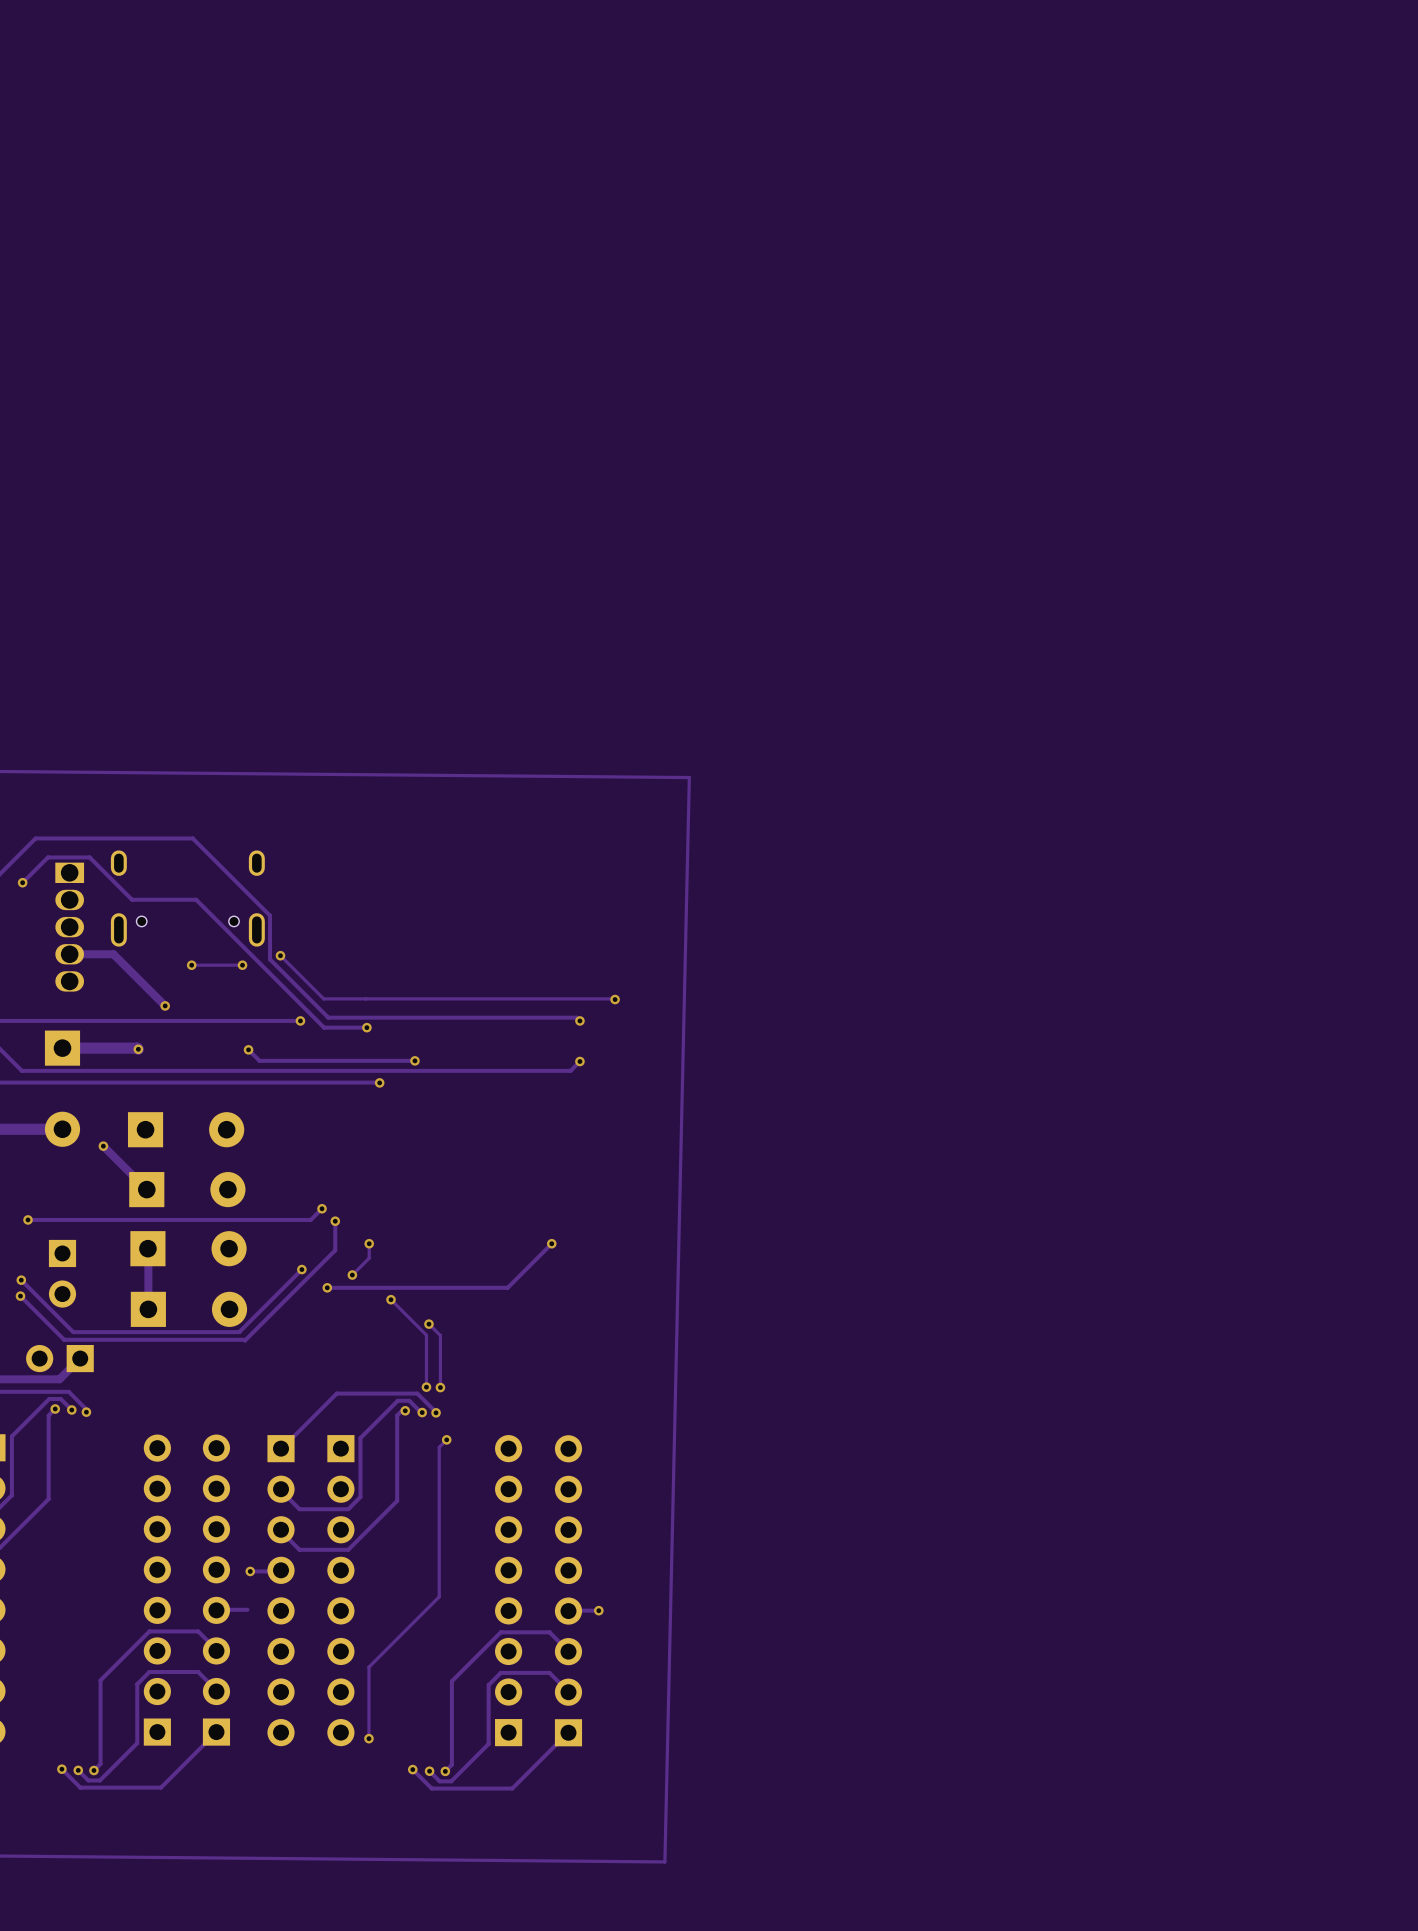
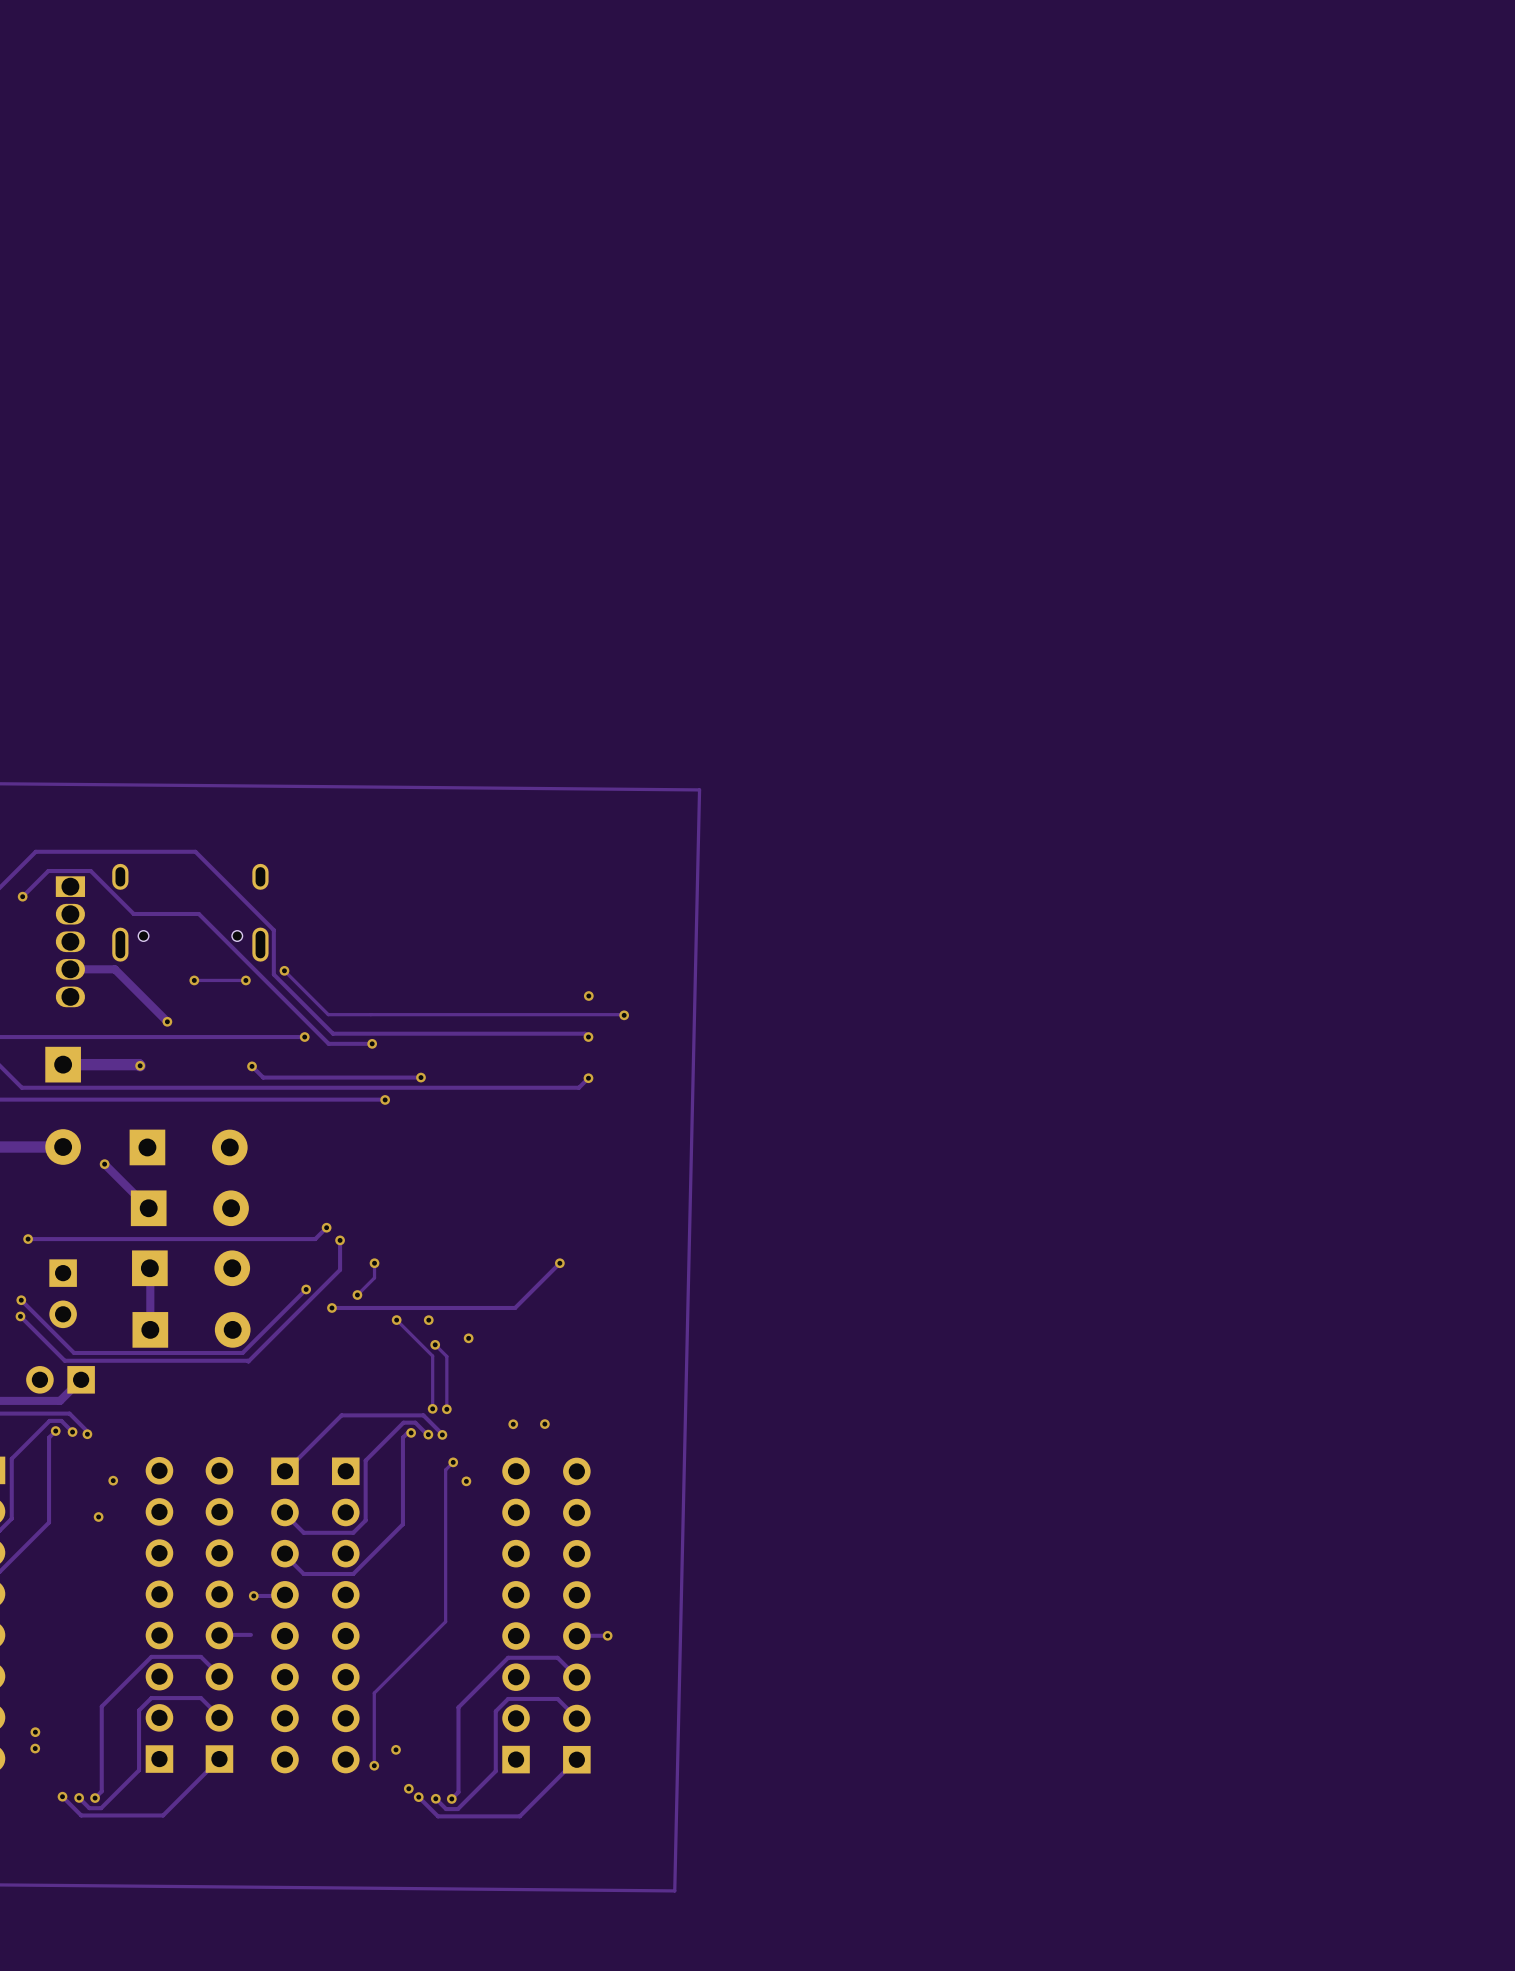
via: none -> (588, 996)
via: none -> (428, 1320)
via: none -> (468, 1338)
via: none -> (513, 1424)
via: none -> (544, 1424)
via: none -> (113, 1480)
via: none -> (466, 1481)
via: none -> (98, 1517)
via: none -> (35, 1732)
via: none -> (35, 1748)
via: none -> (396, 1749)
via: none -> (408, 1788)

